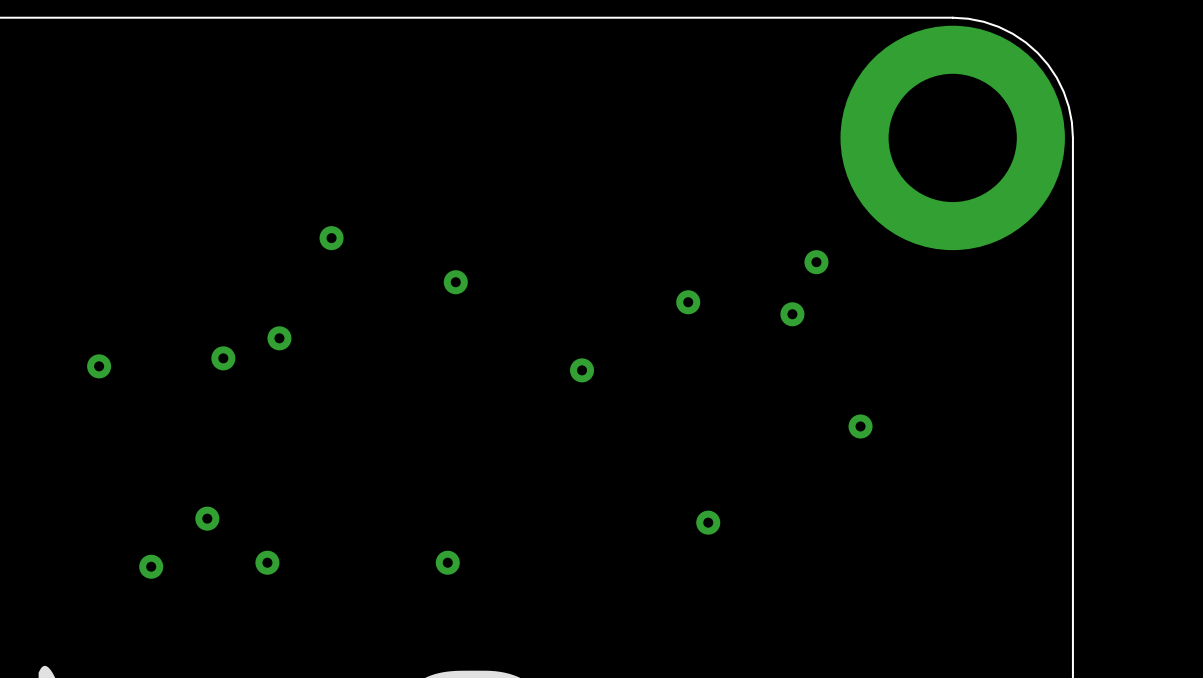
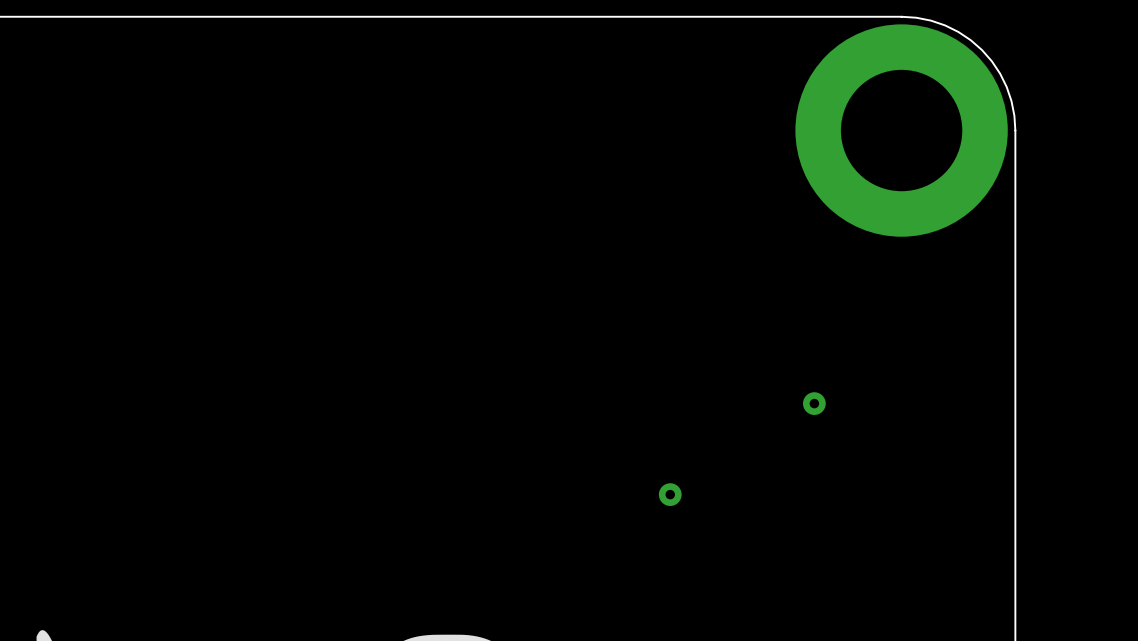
via: (331, 238) -> none
via: (816, 262) -> none
via: (455, 282) -> none
via: (688, 302) -> none
via: (792, 314) -> none
via: (279, 338) -> none
via: (223, 358) -> none
via: (99, 366) -> none
via: (582, 370) -> none
via: (207, 518) -> none
via: (267, 562) -> none
via: (447, 562) -> none
via: (151, 566) -> none

